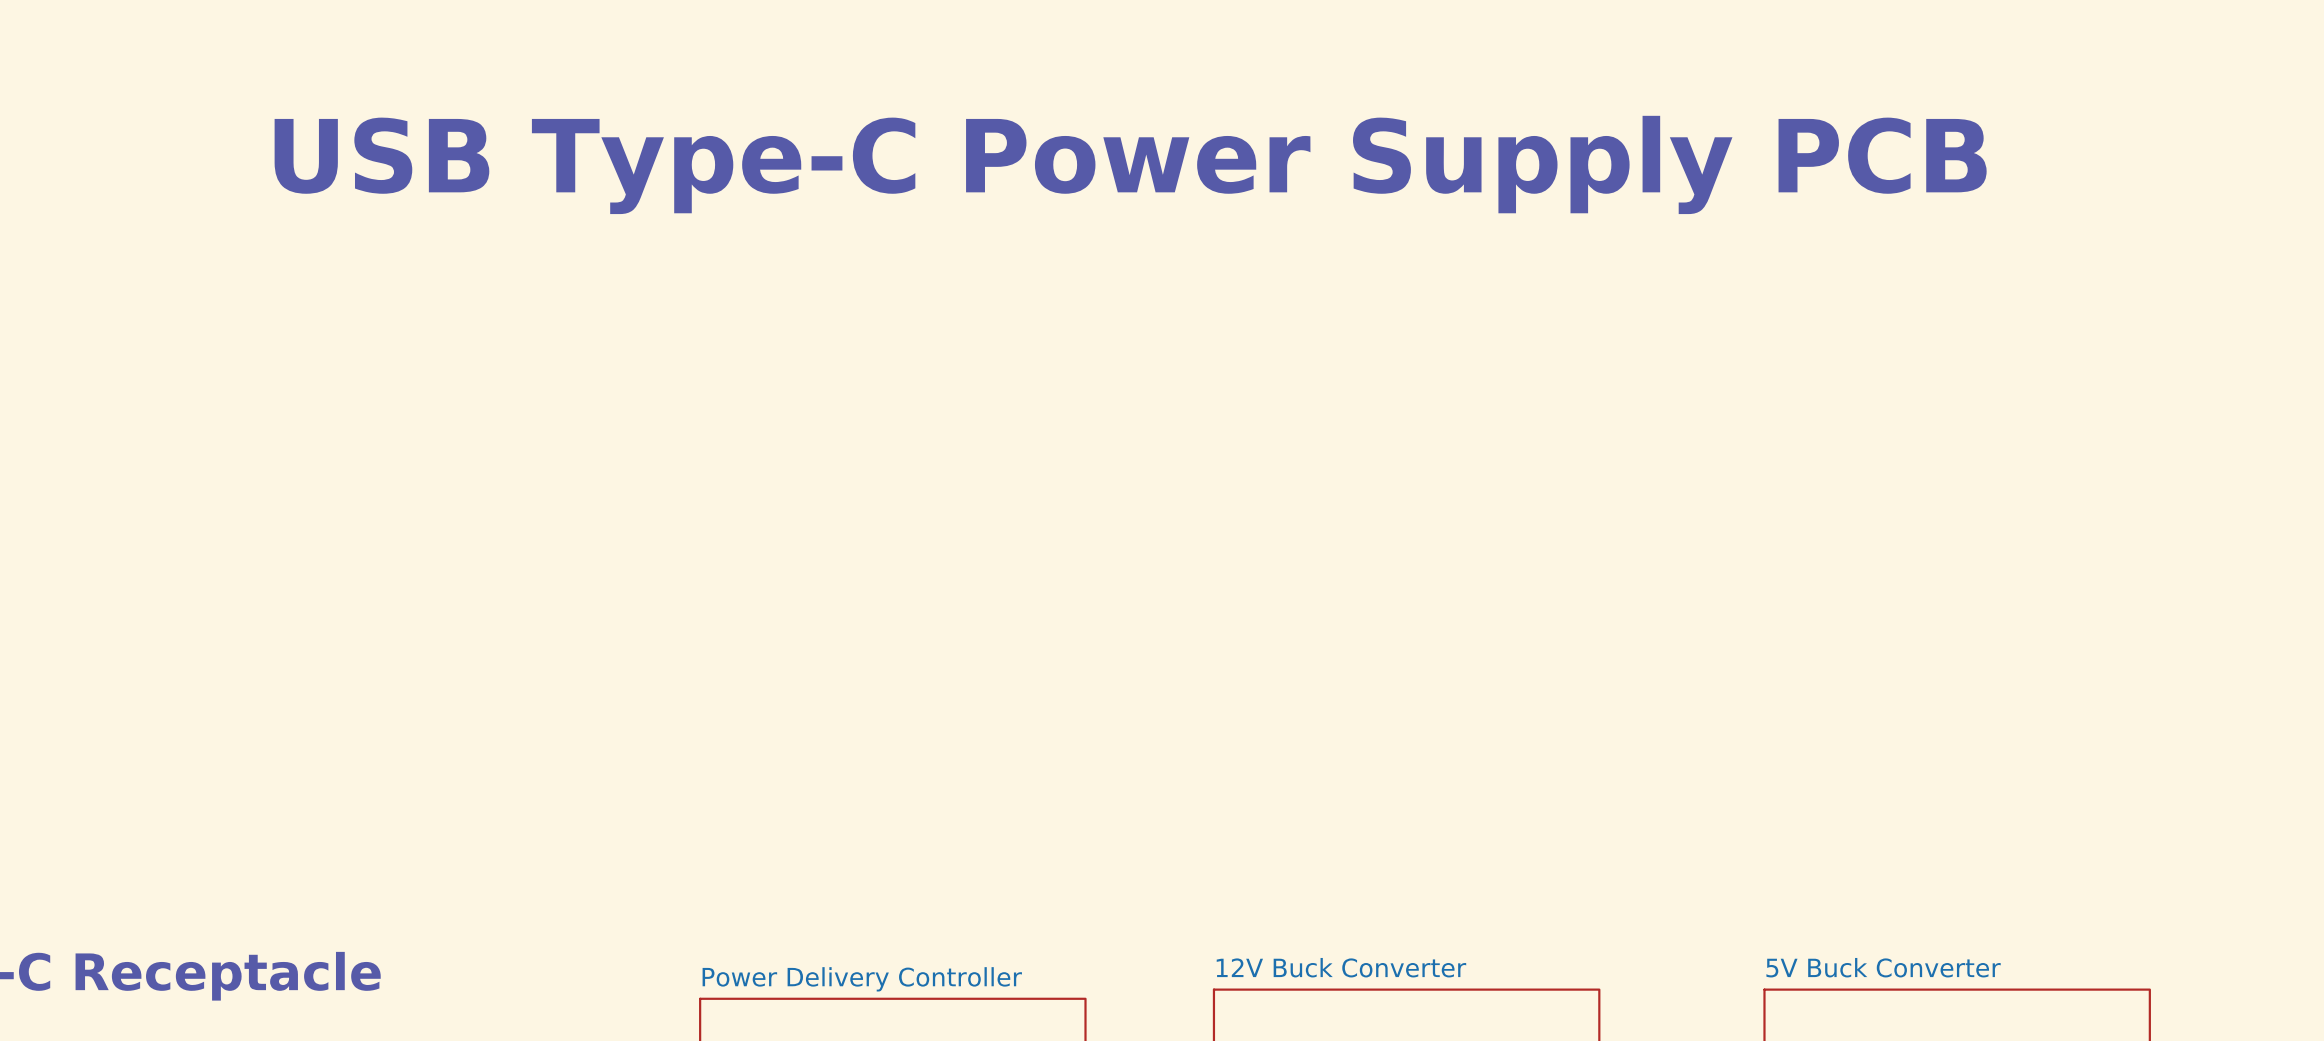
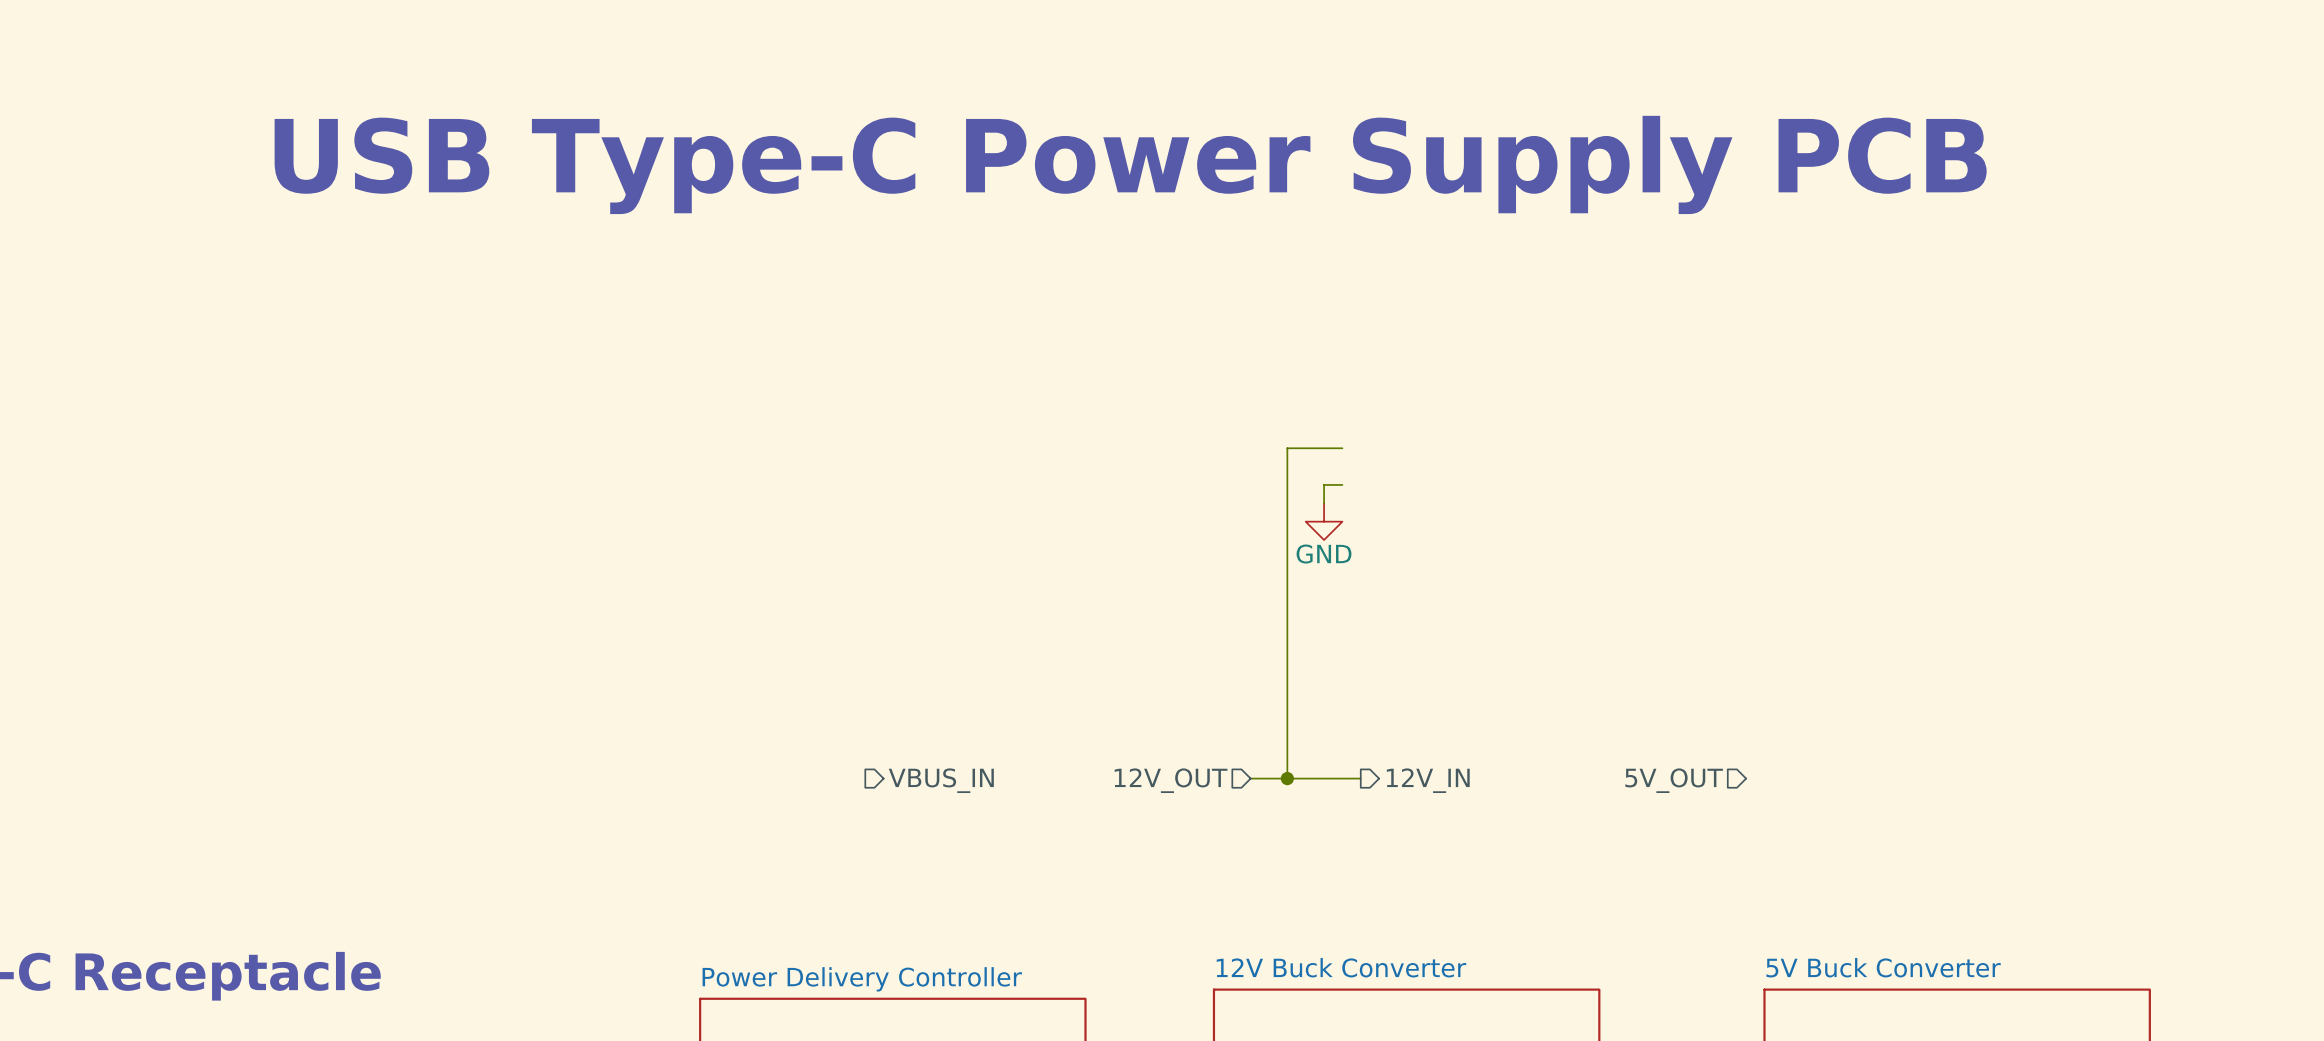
wire: none -> (1342, 448) (1287, 448) (1287, 778)
wire: none -> (1342, 484) (1324, 484) (1324, 503)
power symbol: none -> GND (1324, 521)
wire: none -> (1250, 778) (1360, 778)
junction: none -> (1287, 778)
sheet pin: none -> VBUS_IN (941, 780)
sheet pin: none -> 12V_OUT (1171, 780)
sheet pin: none -> 12V_IN (1428, 780)
sheet pin: none -> 5V_OUT (1674, 780)

